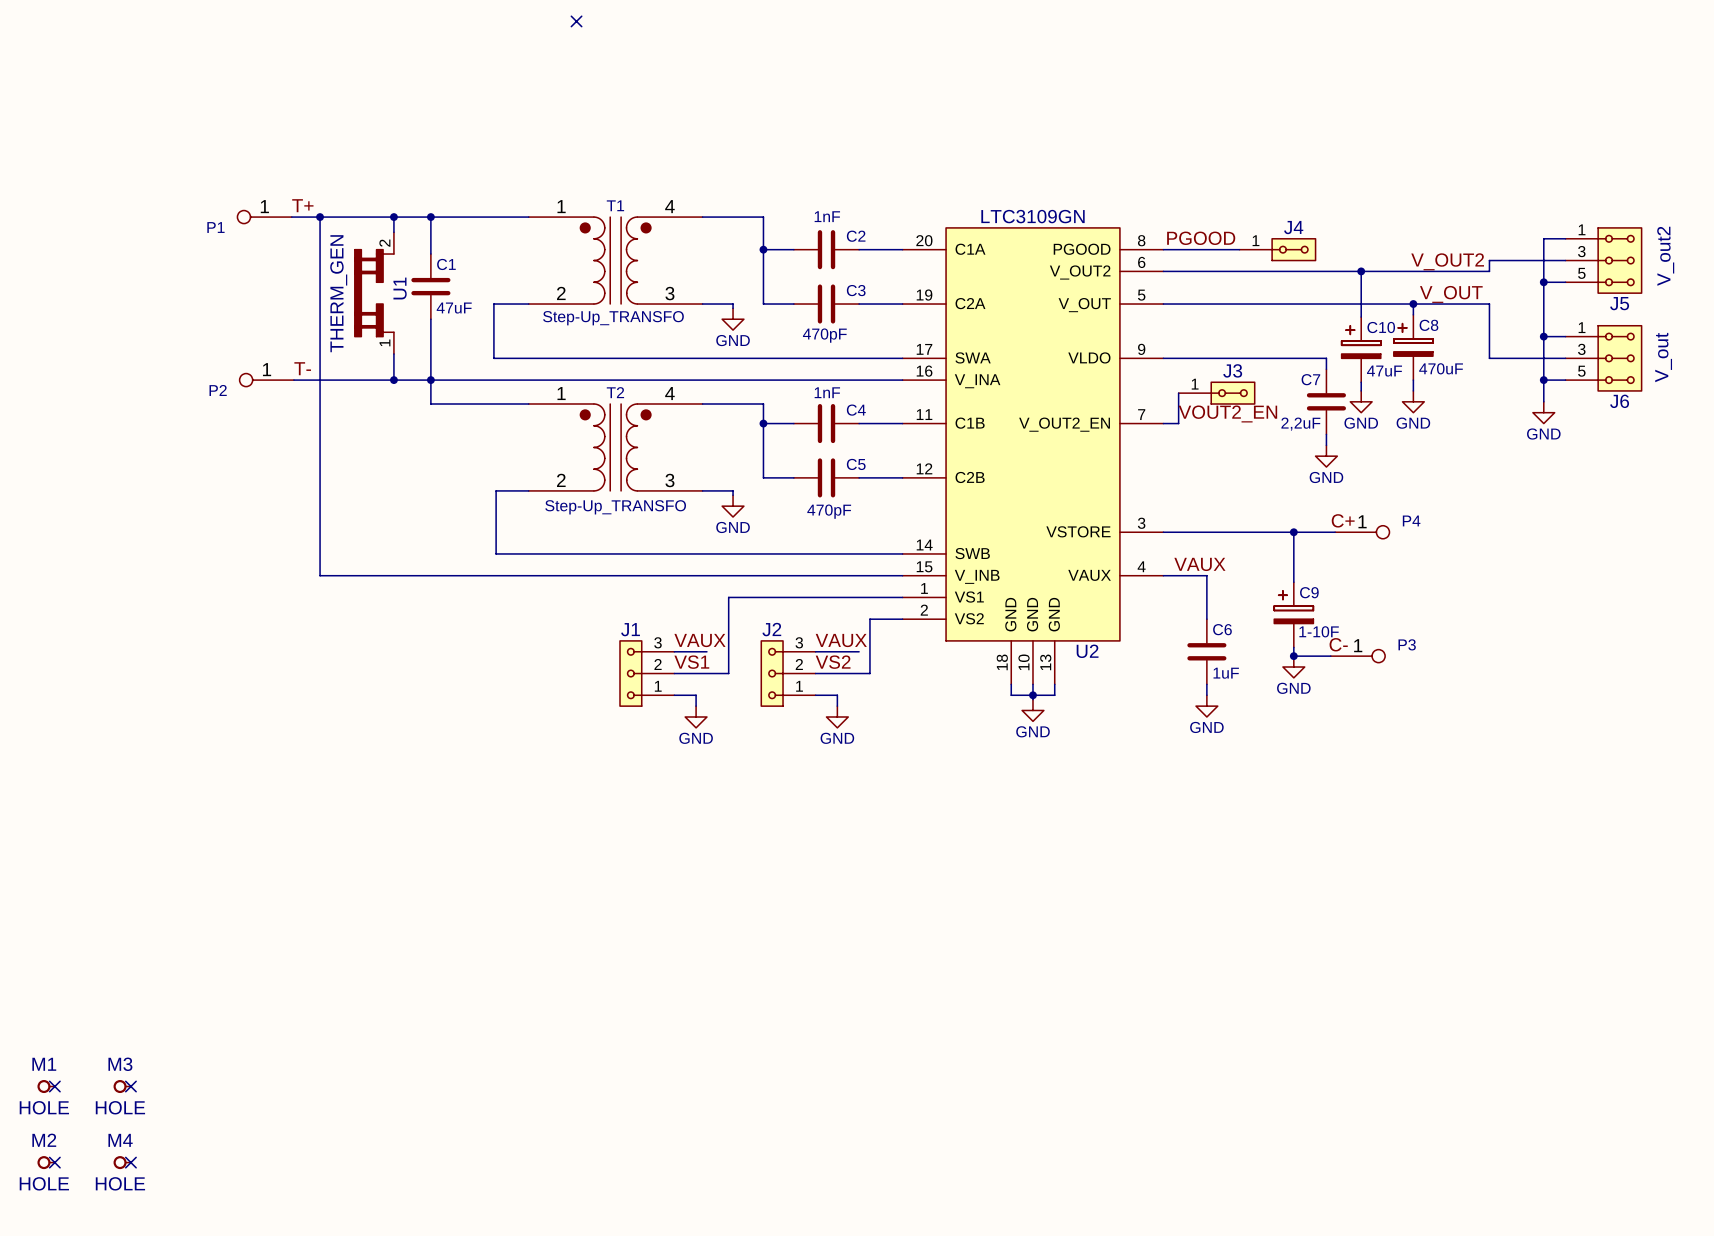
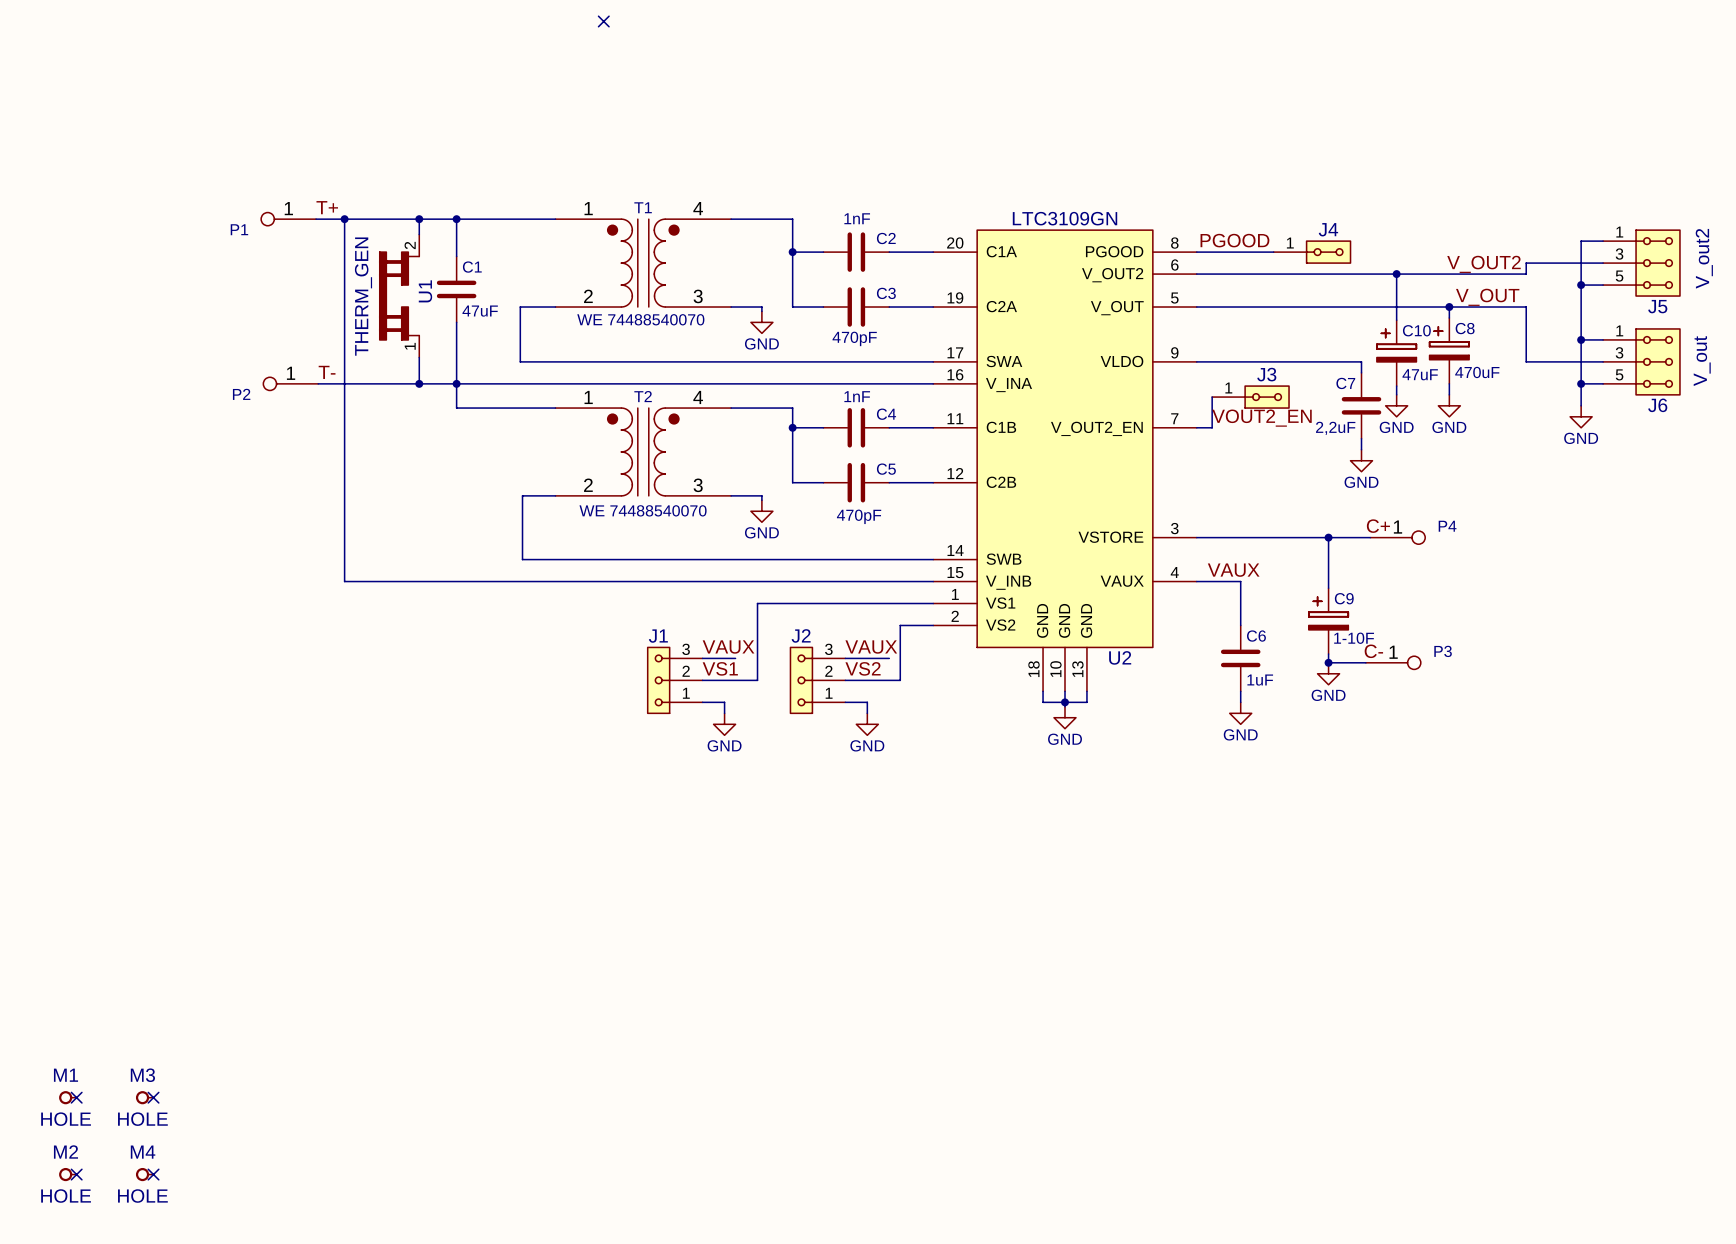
T1 value: Step-Up_TRANSFO (613, 318) -> WE 74488540070 (640, 319)
T2 value: Step-Up_TRANSFO (615, 507) -> WE 74488540070 (643, 510)

